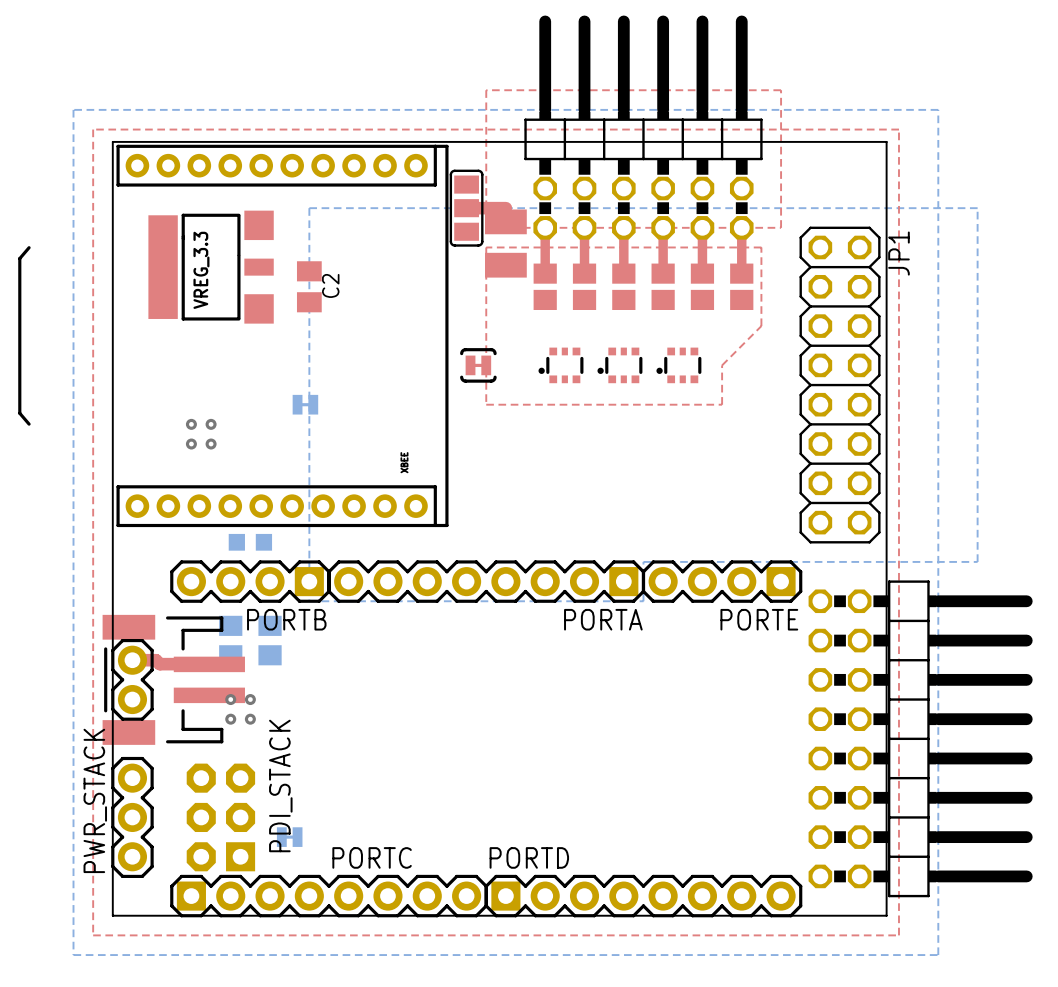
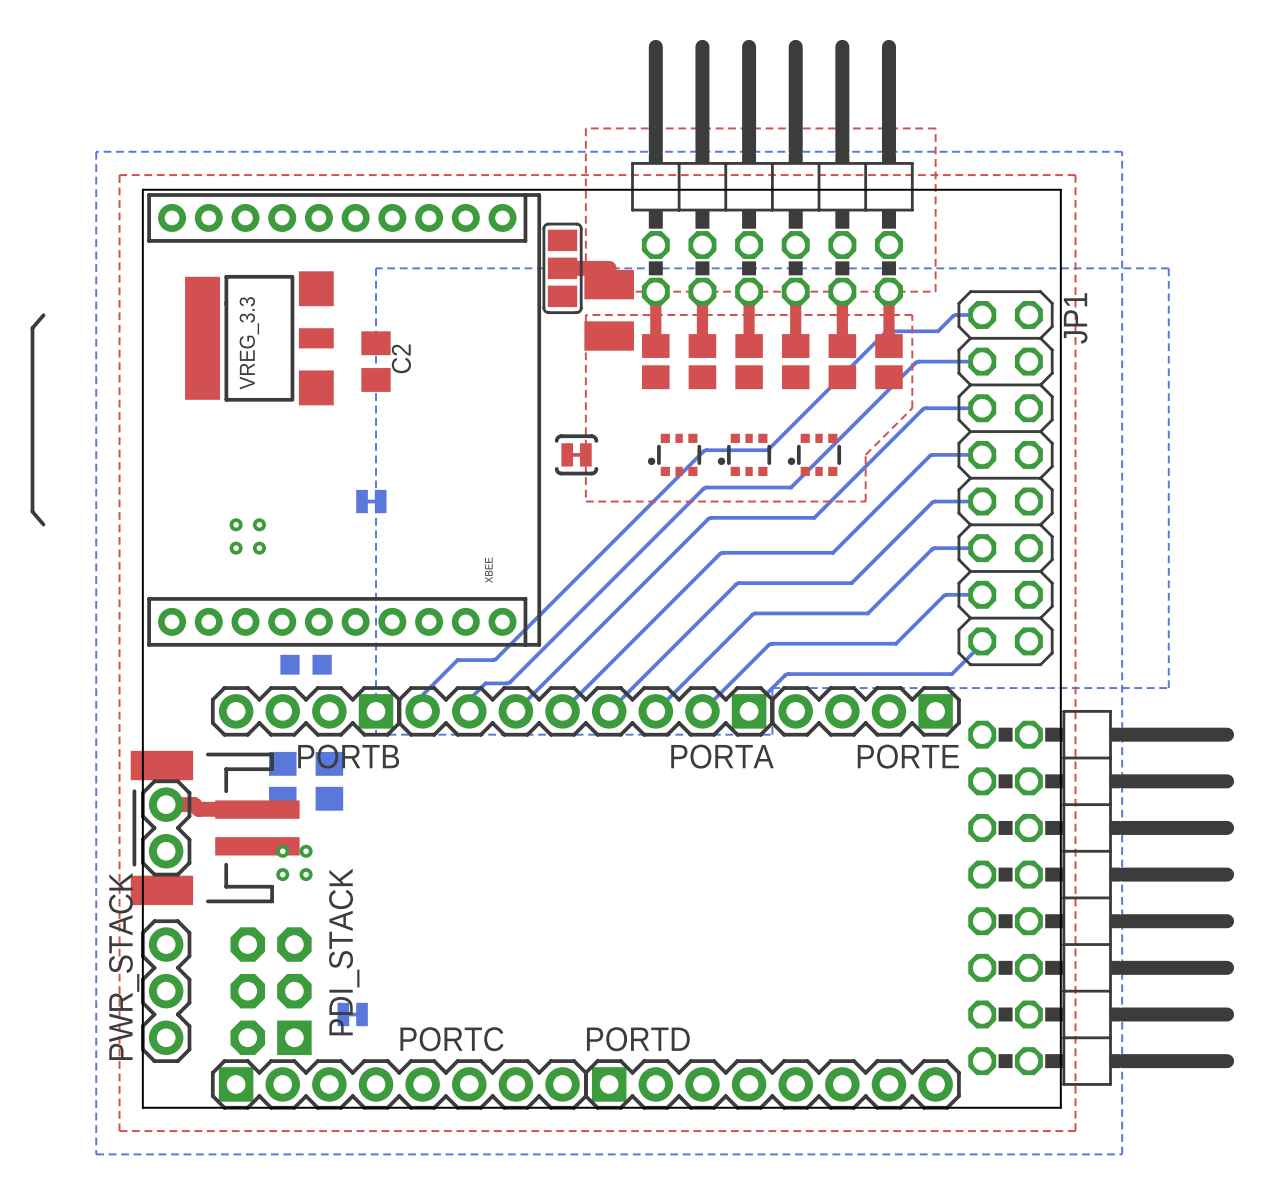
bottom track: none -> (982, 314) (954, 315) (937, 331) (886, 331) (767, 450) (703, 451) (495, 659) (457, 660) (423, 694) (422, 711)
bottom track: none -> (982, 361) (916, 362) (791, 487) (703, 488) (510, 682) (485, 683) (469, 699) (469, 711)
bottom track: none -> (982, 408) (923, 408) (814, 517) (709, 518) (515, 711)
bottom track: none -> (982, 454) (930, 455) (833, 552) (720, 553) (562, 711)
bottom track: none -> (982, 501) (932, 502) (851, 583) (737, 583) (609, 711)
bottom track: none -> (982, 548) (932, 548) (867, 613) (753, 614) (655, 711)
bottom track: none -> (982, 594) (944, 595) (895, 643) (770, 644) (702, 711)
bottom track: none -> (982, 641) (980, 645) (951, 674) (787, 674) (749, 711)

